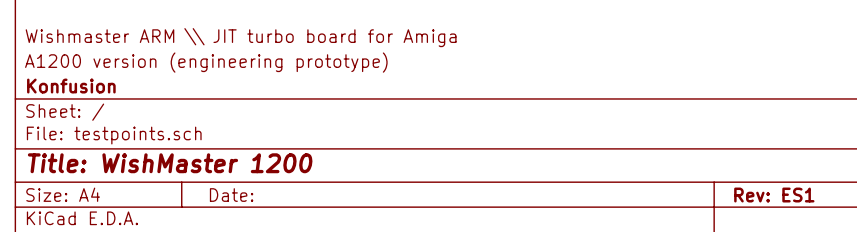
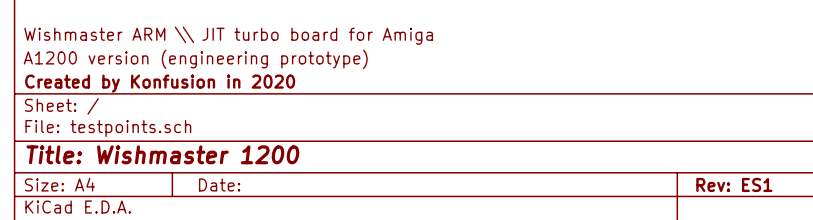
title block: Konfusion (71, 86) -> Created by Konfusion in 2020 (160, 83)
title block: Title: WishMaster 1200 (170, 163) -> Title: Wishmaster 1200 (162, 154)

